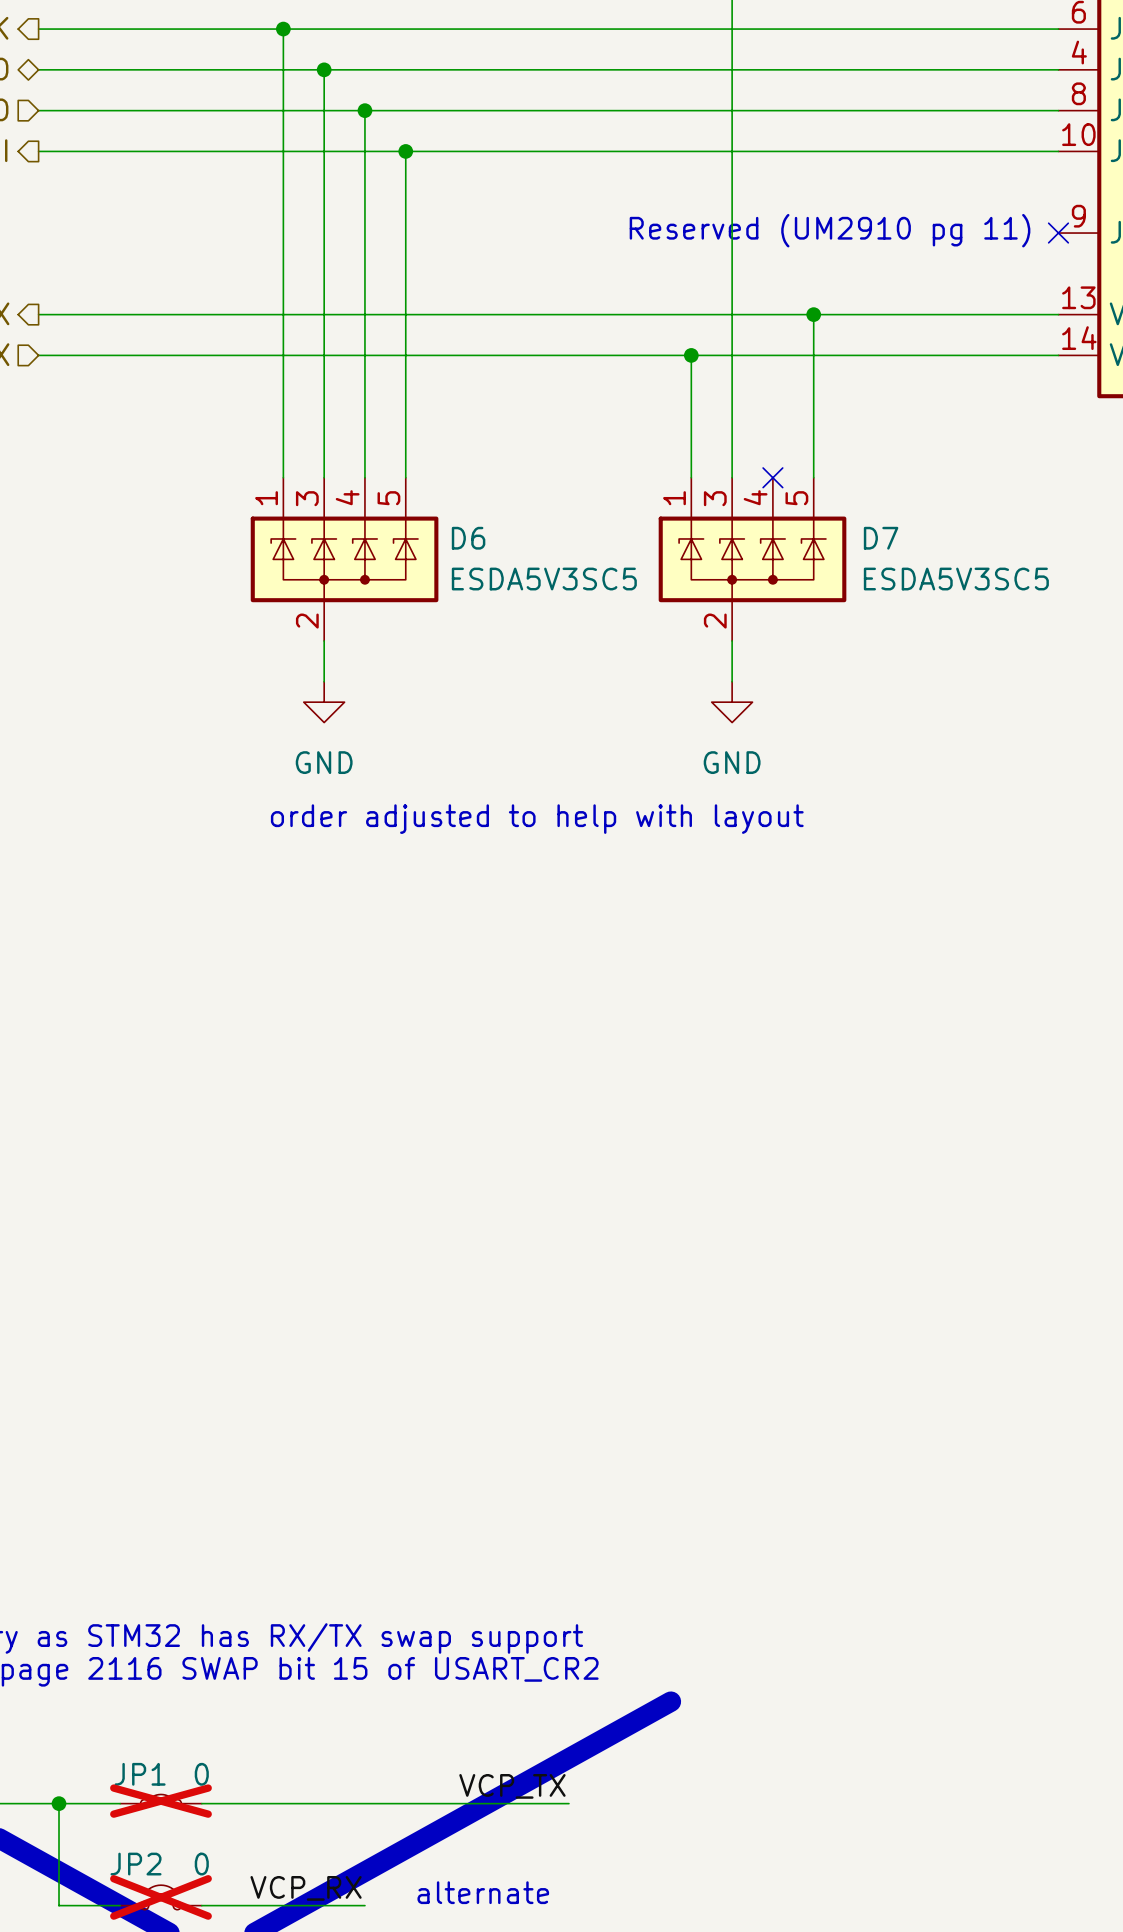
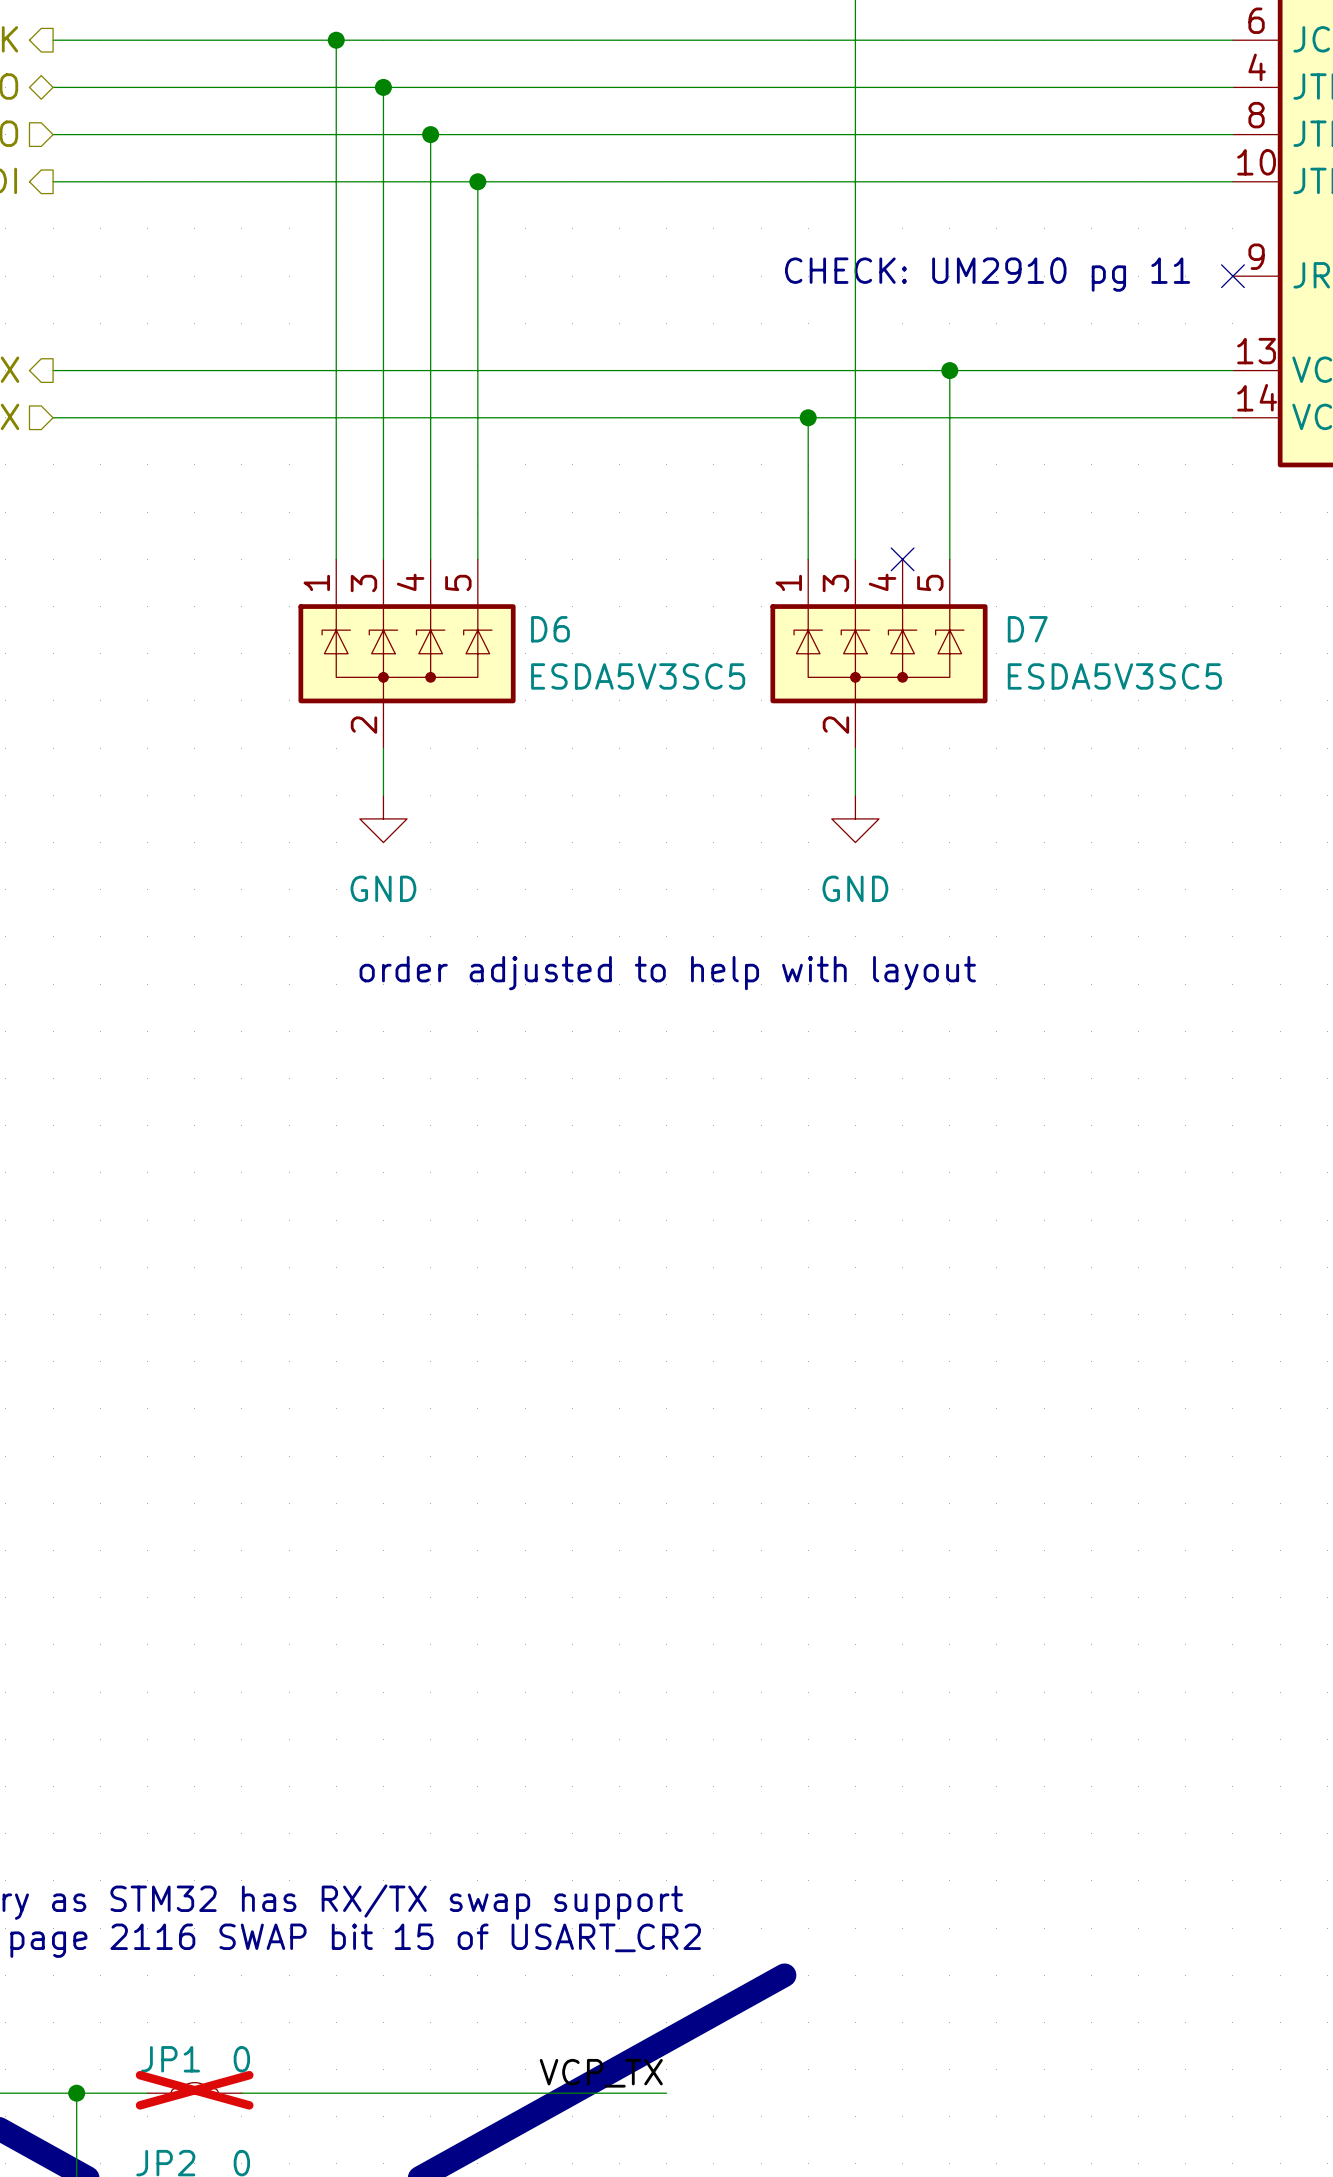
text: Reserved (UM2910 pg 11) (830, 230) -> CHECK: UM2910 pg 11 (987, 274)
text position: order adjusted to help with layout (537, 819) -> order adjusted to help with layout (667, 973)

